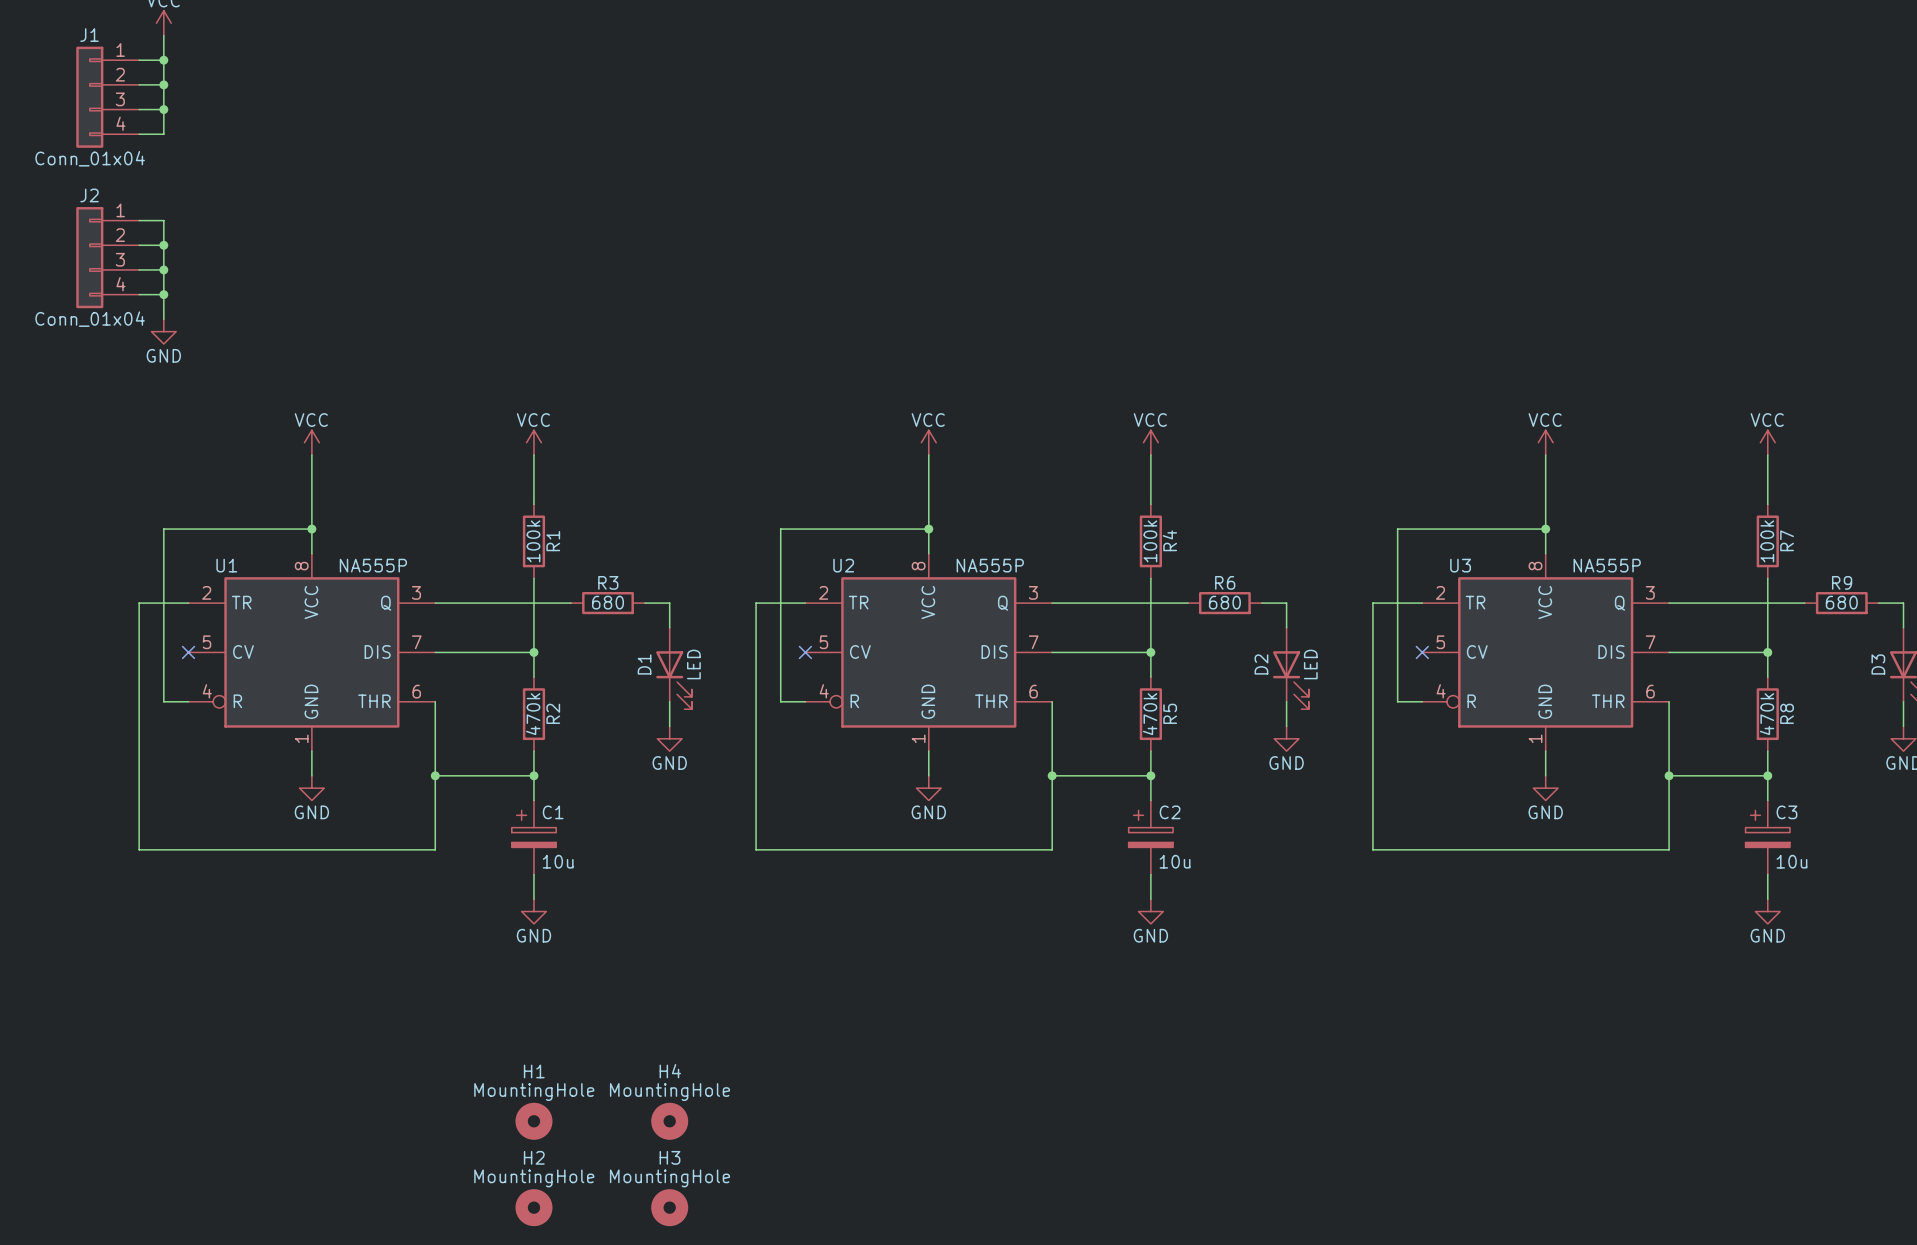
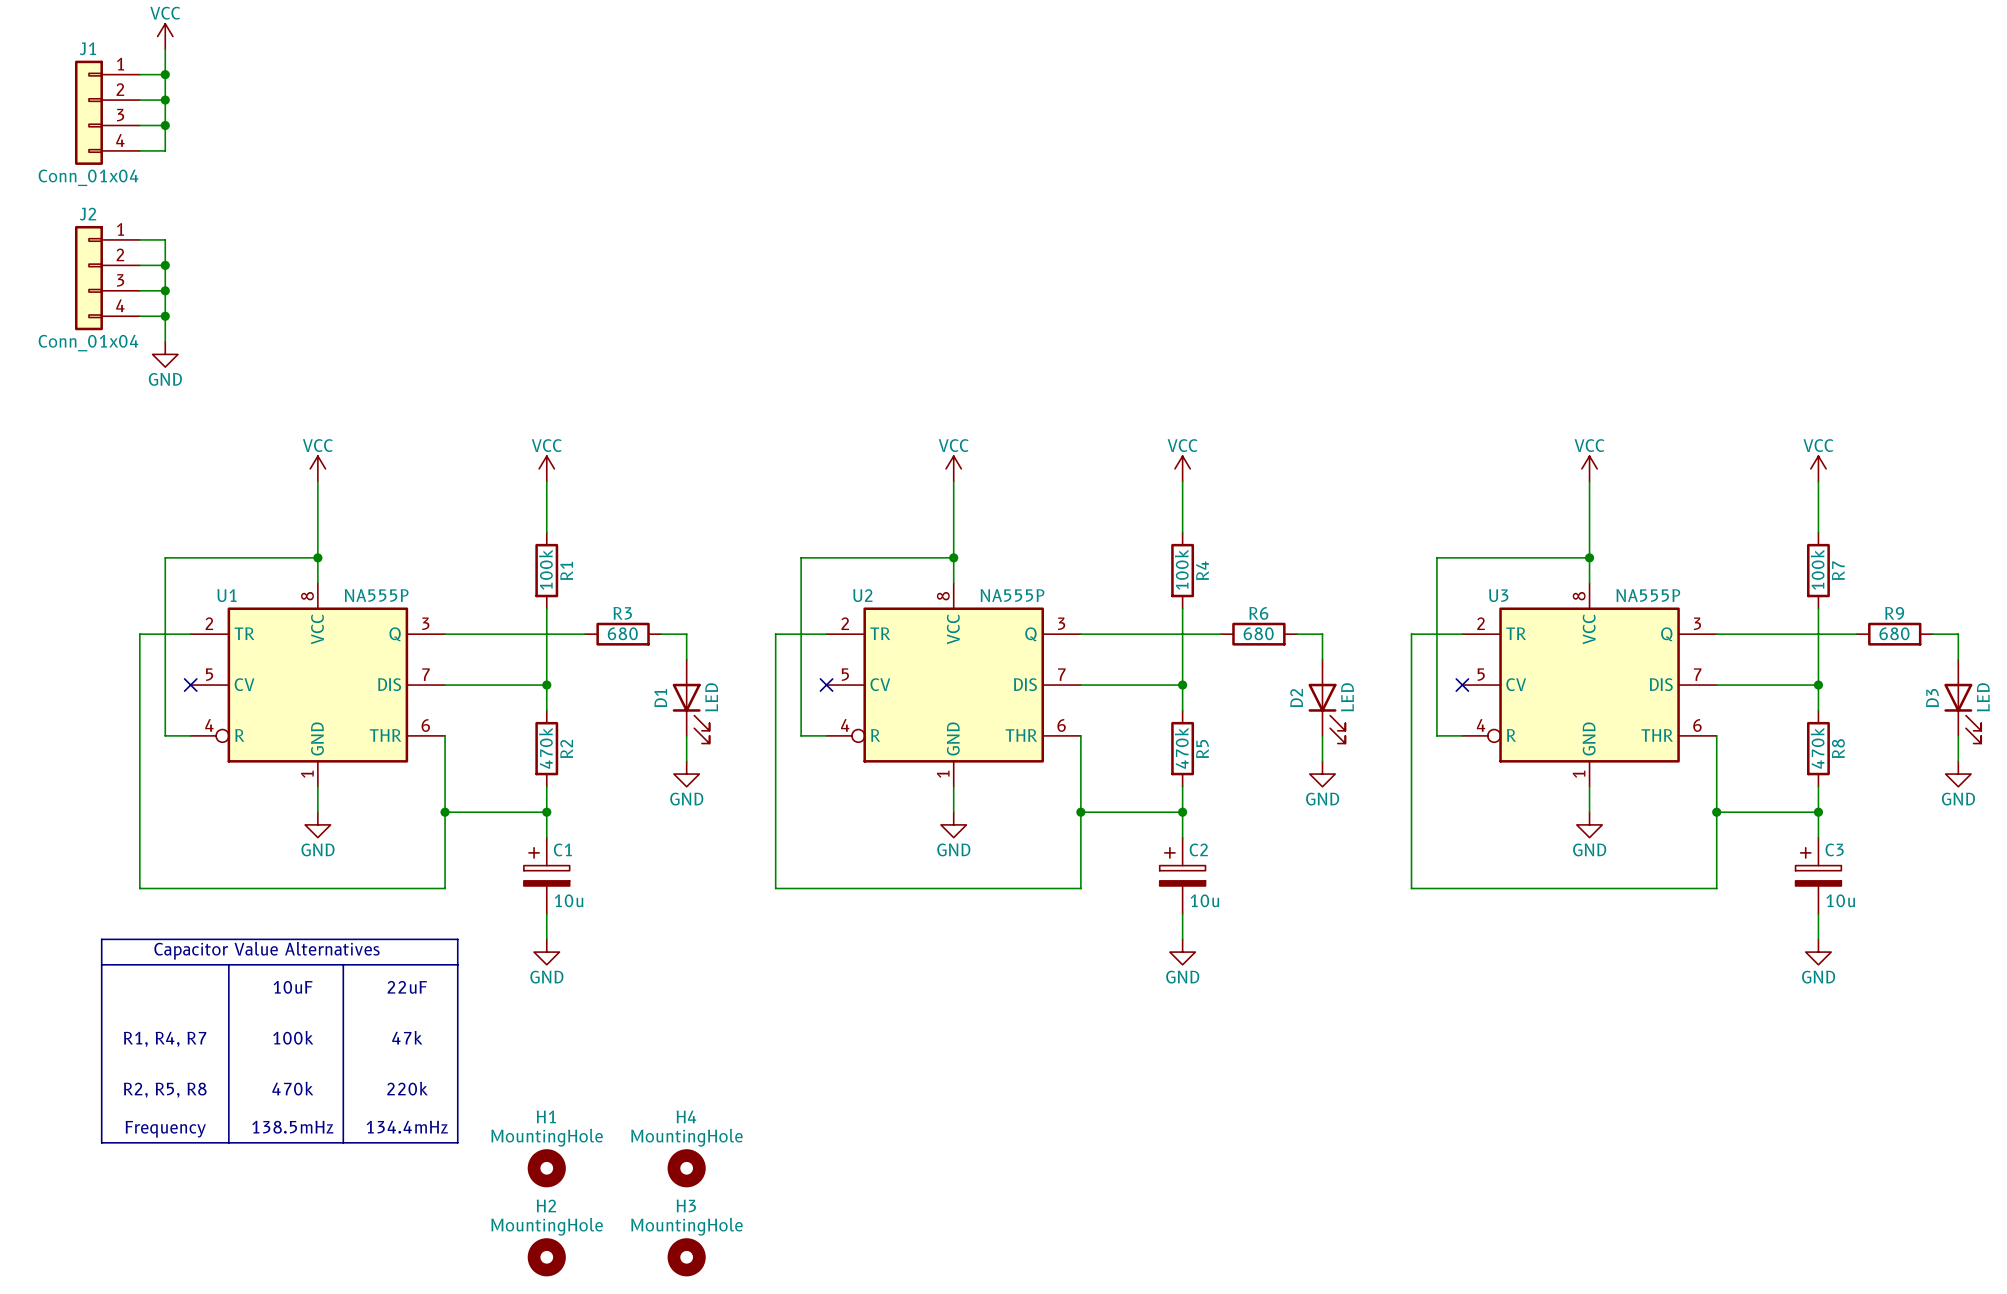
line: none -> (101, 939) (101, 1142) (457, 1142) (457, 939) (101, 939)
text: none -> Capacitor Value Alternatives (266, 950)
line: none -> (101, 964) (457, 964)
line: none -> (228, 964) (228, 1142)
line: none -> (343, 964) (343, 1142)
text: none -> 10uF (293, 987)
text: none -> 22uF (407, 987)
text: none -> 47k (407, 1037)
text: none -> R1, R4, R7 (165, 1039)
text: none -> 100k (293, 1037)
text: none -> 470k (292, 1088)
text: none -> 220k (407, 1088)
text: none -> R2, R5, R8 (165, 1090)
text: none -> 138.5mHz (292, 1127)
text: none -> 134.4mHz (407, 1127)
text: none -> Frequency (165, 1129)

